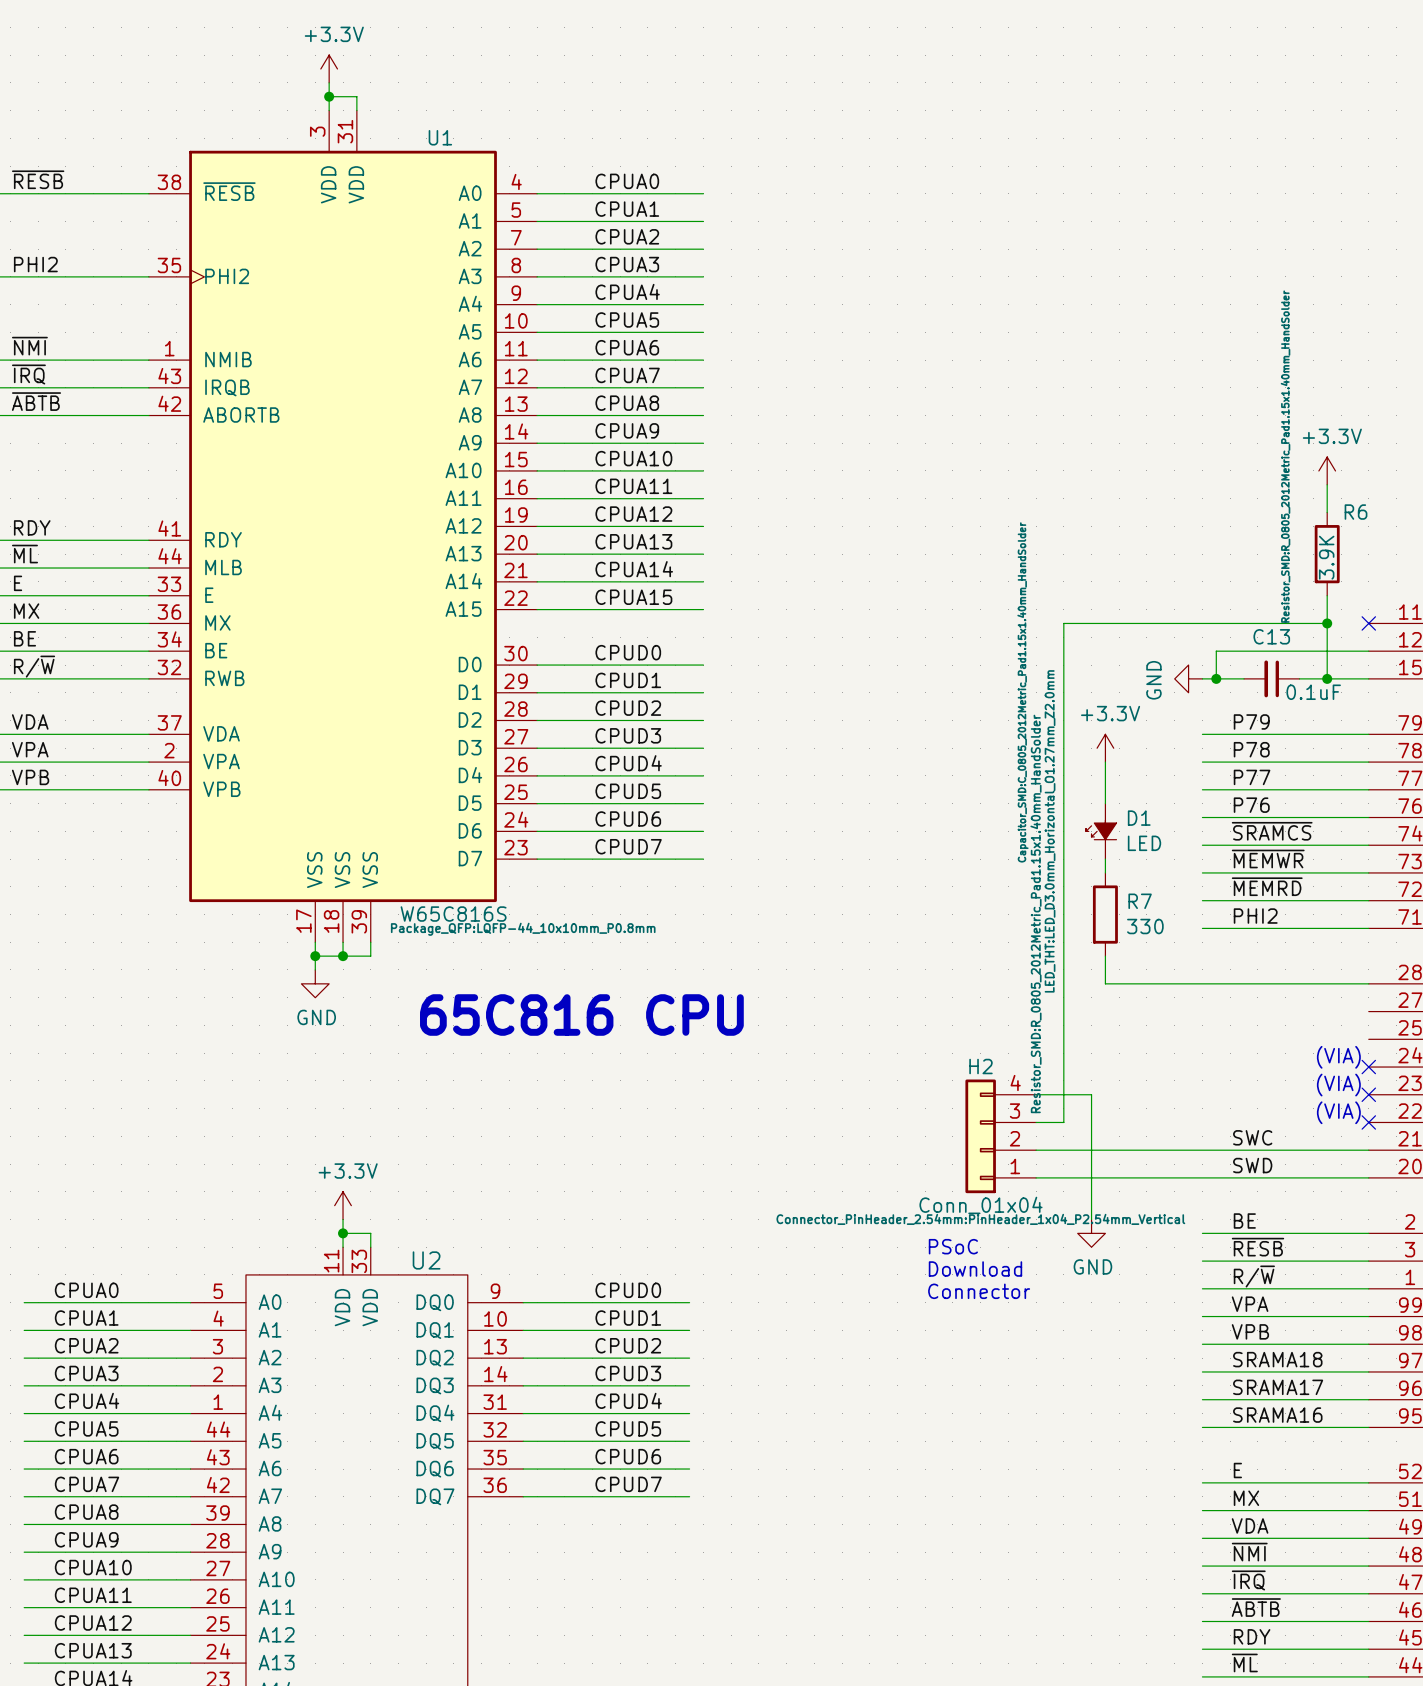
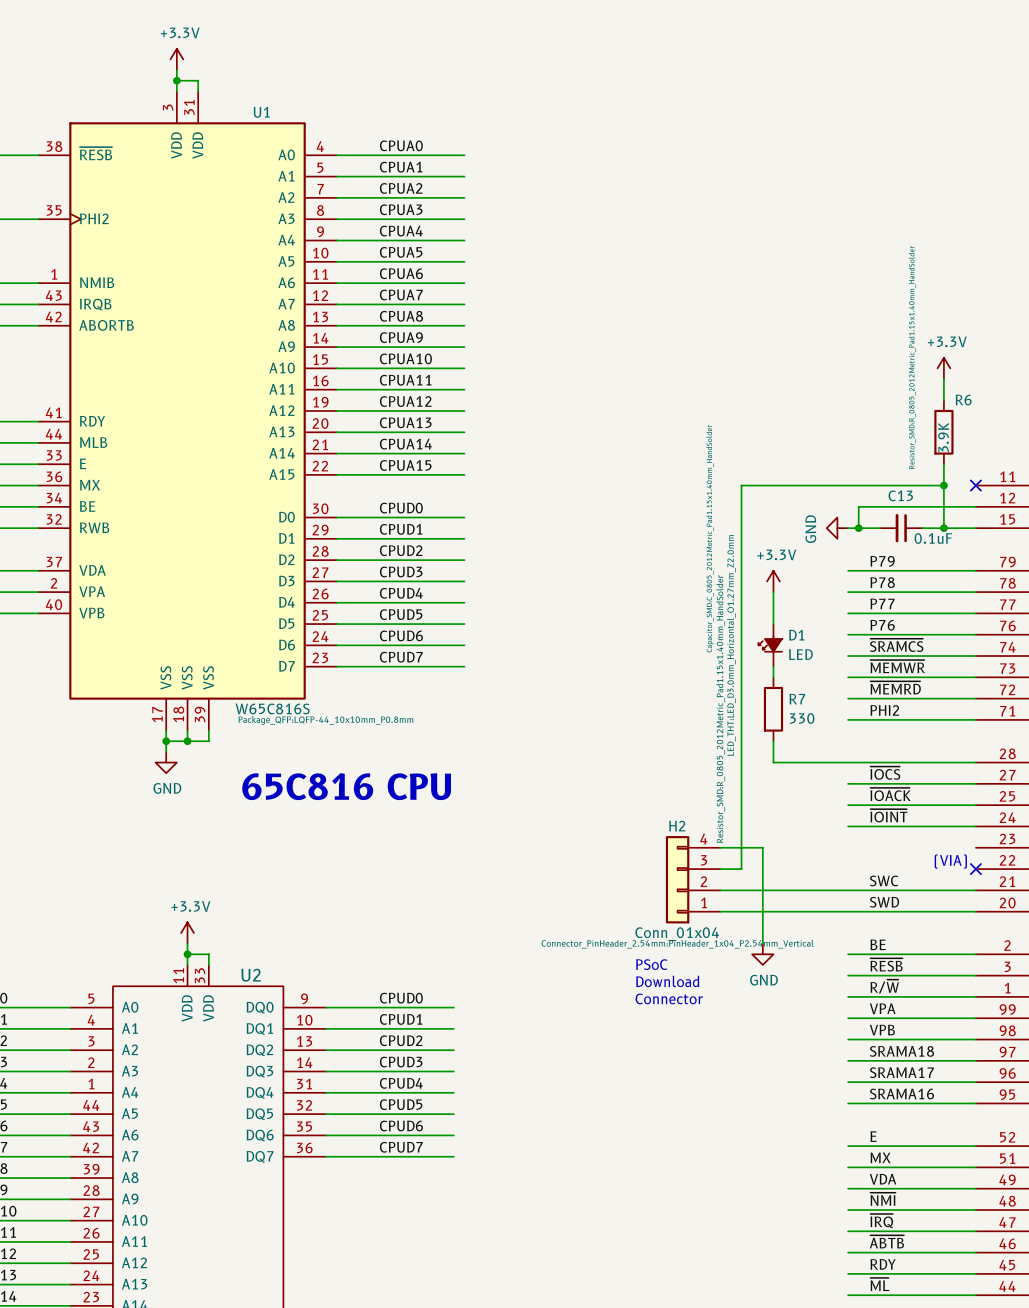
label: none -> ~{IOCS} (885, 773)
wire: none -> (848, 783) (975, 783)
label: none -> ~{IOACK} (890, 794)
wire: none -> (848, 805) (975, 805)
label: none -> ~{IOINT} (888, 815)
text: (VIA) (1338, 1057) -> none
wire: none -> (848, 826) (975, 826)
no-connect mark: (1368, 1067) -> none
text: (VIA) (1338, 1085) -> none
no-connect mark: (1368, 1094) -> none

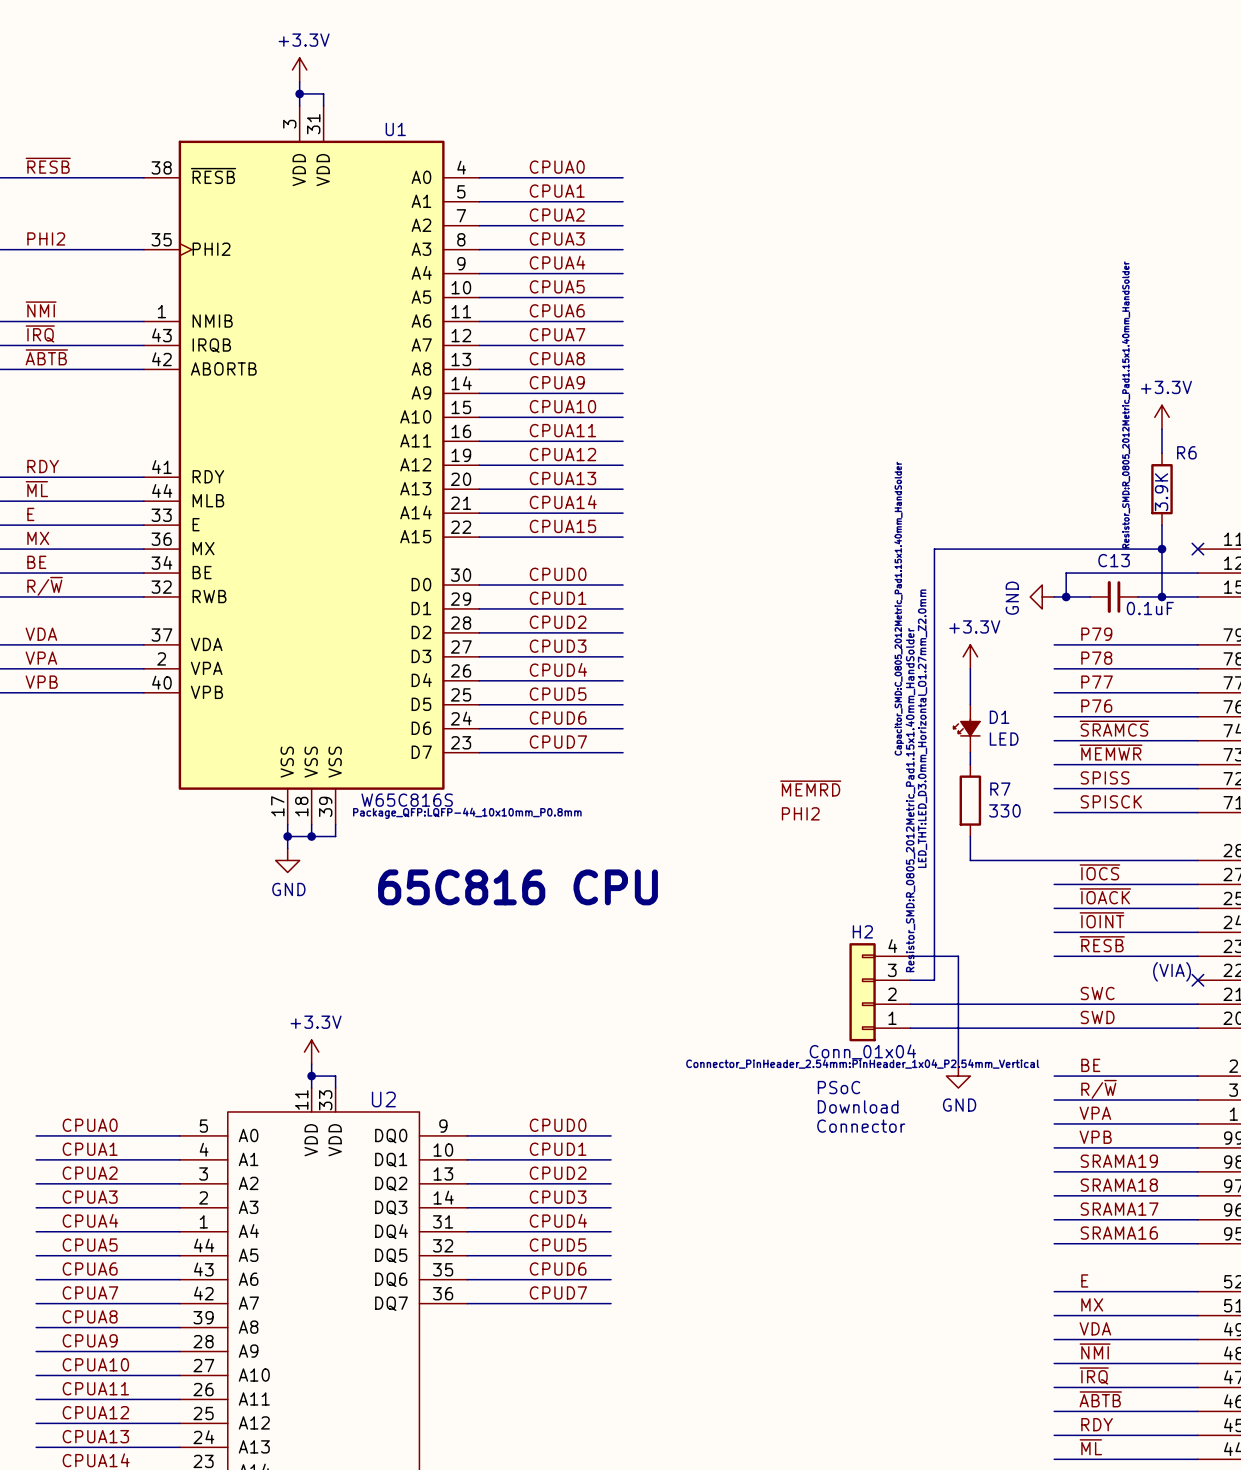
label: ~{MEMRD} (895, 687) -> SPISS (1105, 777)
label: none -> ~{MEMRD} (810, 788)
label: PHI2 (884, 710) -> SPISCK (1111, 801)
label: none -> PHI2 (800, 813)
label: none -> ~{RESB} (1102, 944)
wire: none -> (1054, 956) (1197, 956)
label: ~{RESB} (886, 964) -> R/~{W} (1099, 1089)
label: R/~{W} (884, 986) -> VPA (1095, 1113)
label: VPA (882, 1008) -> VPB (1095, 1137)
label: VPB (882, 1030) -> SRAMA19 (1119, 1161)

